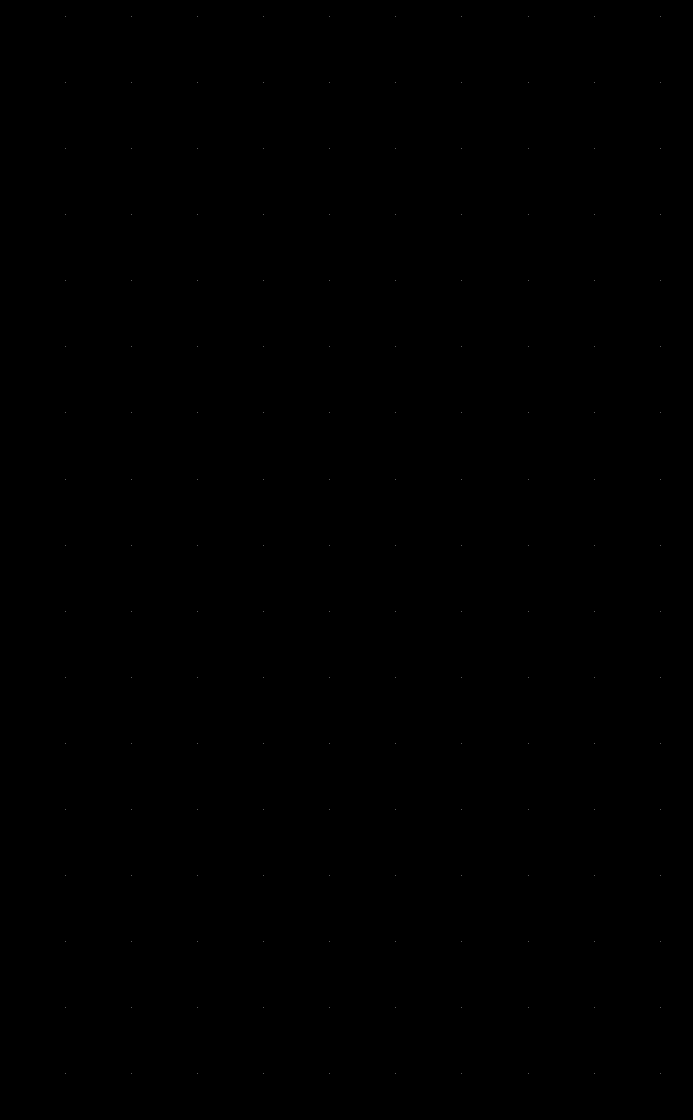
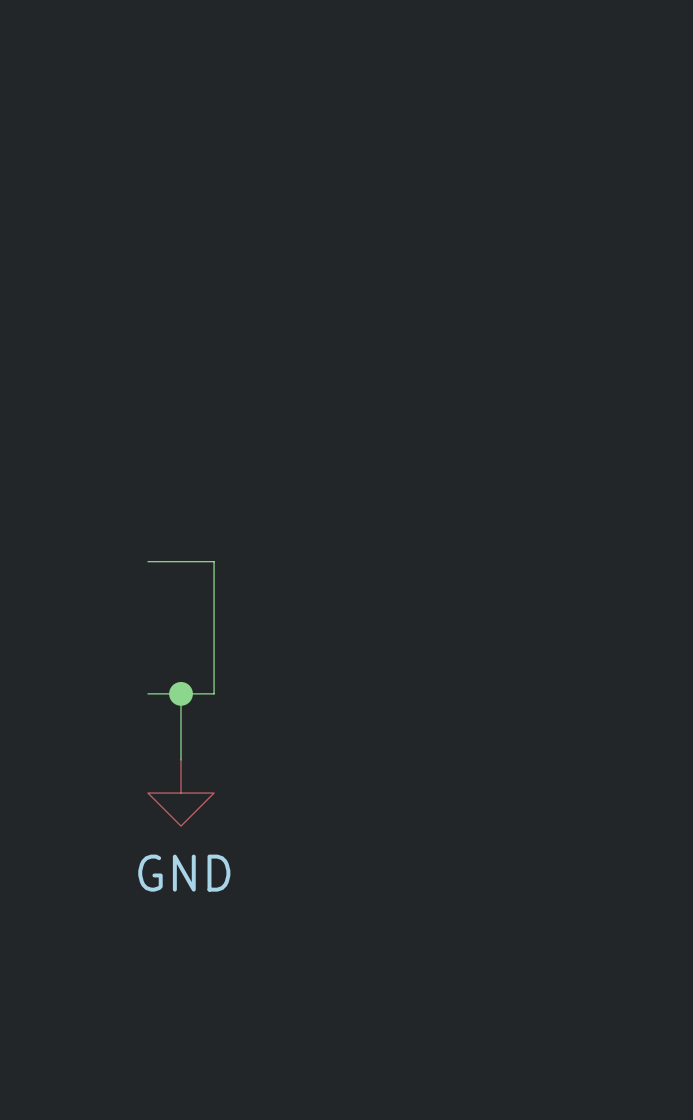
wire: none -> (147, 561) (214, 561) (214, 693) (147, 693)
wire: none -> (181, 693) (181, 759)
junction: none -> (181, 693)
power symbol: none -> GND (181, 793)

